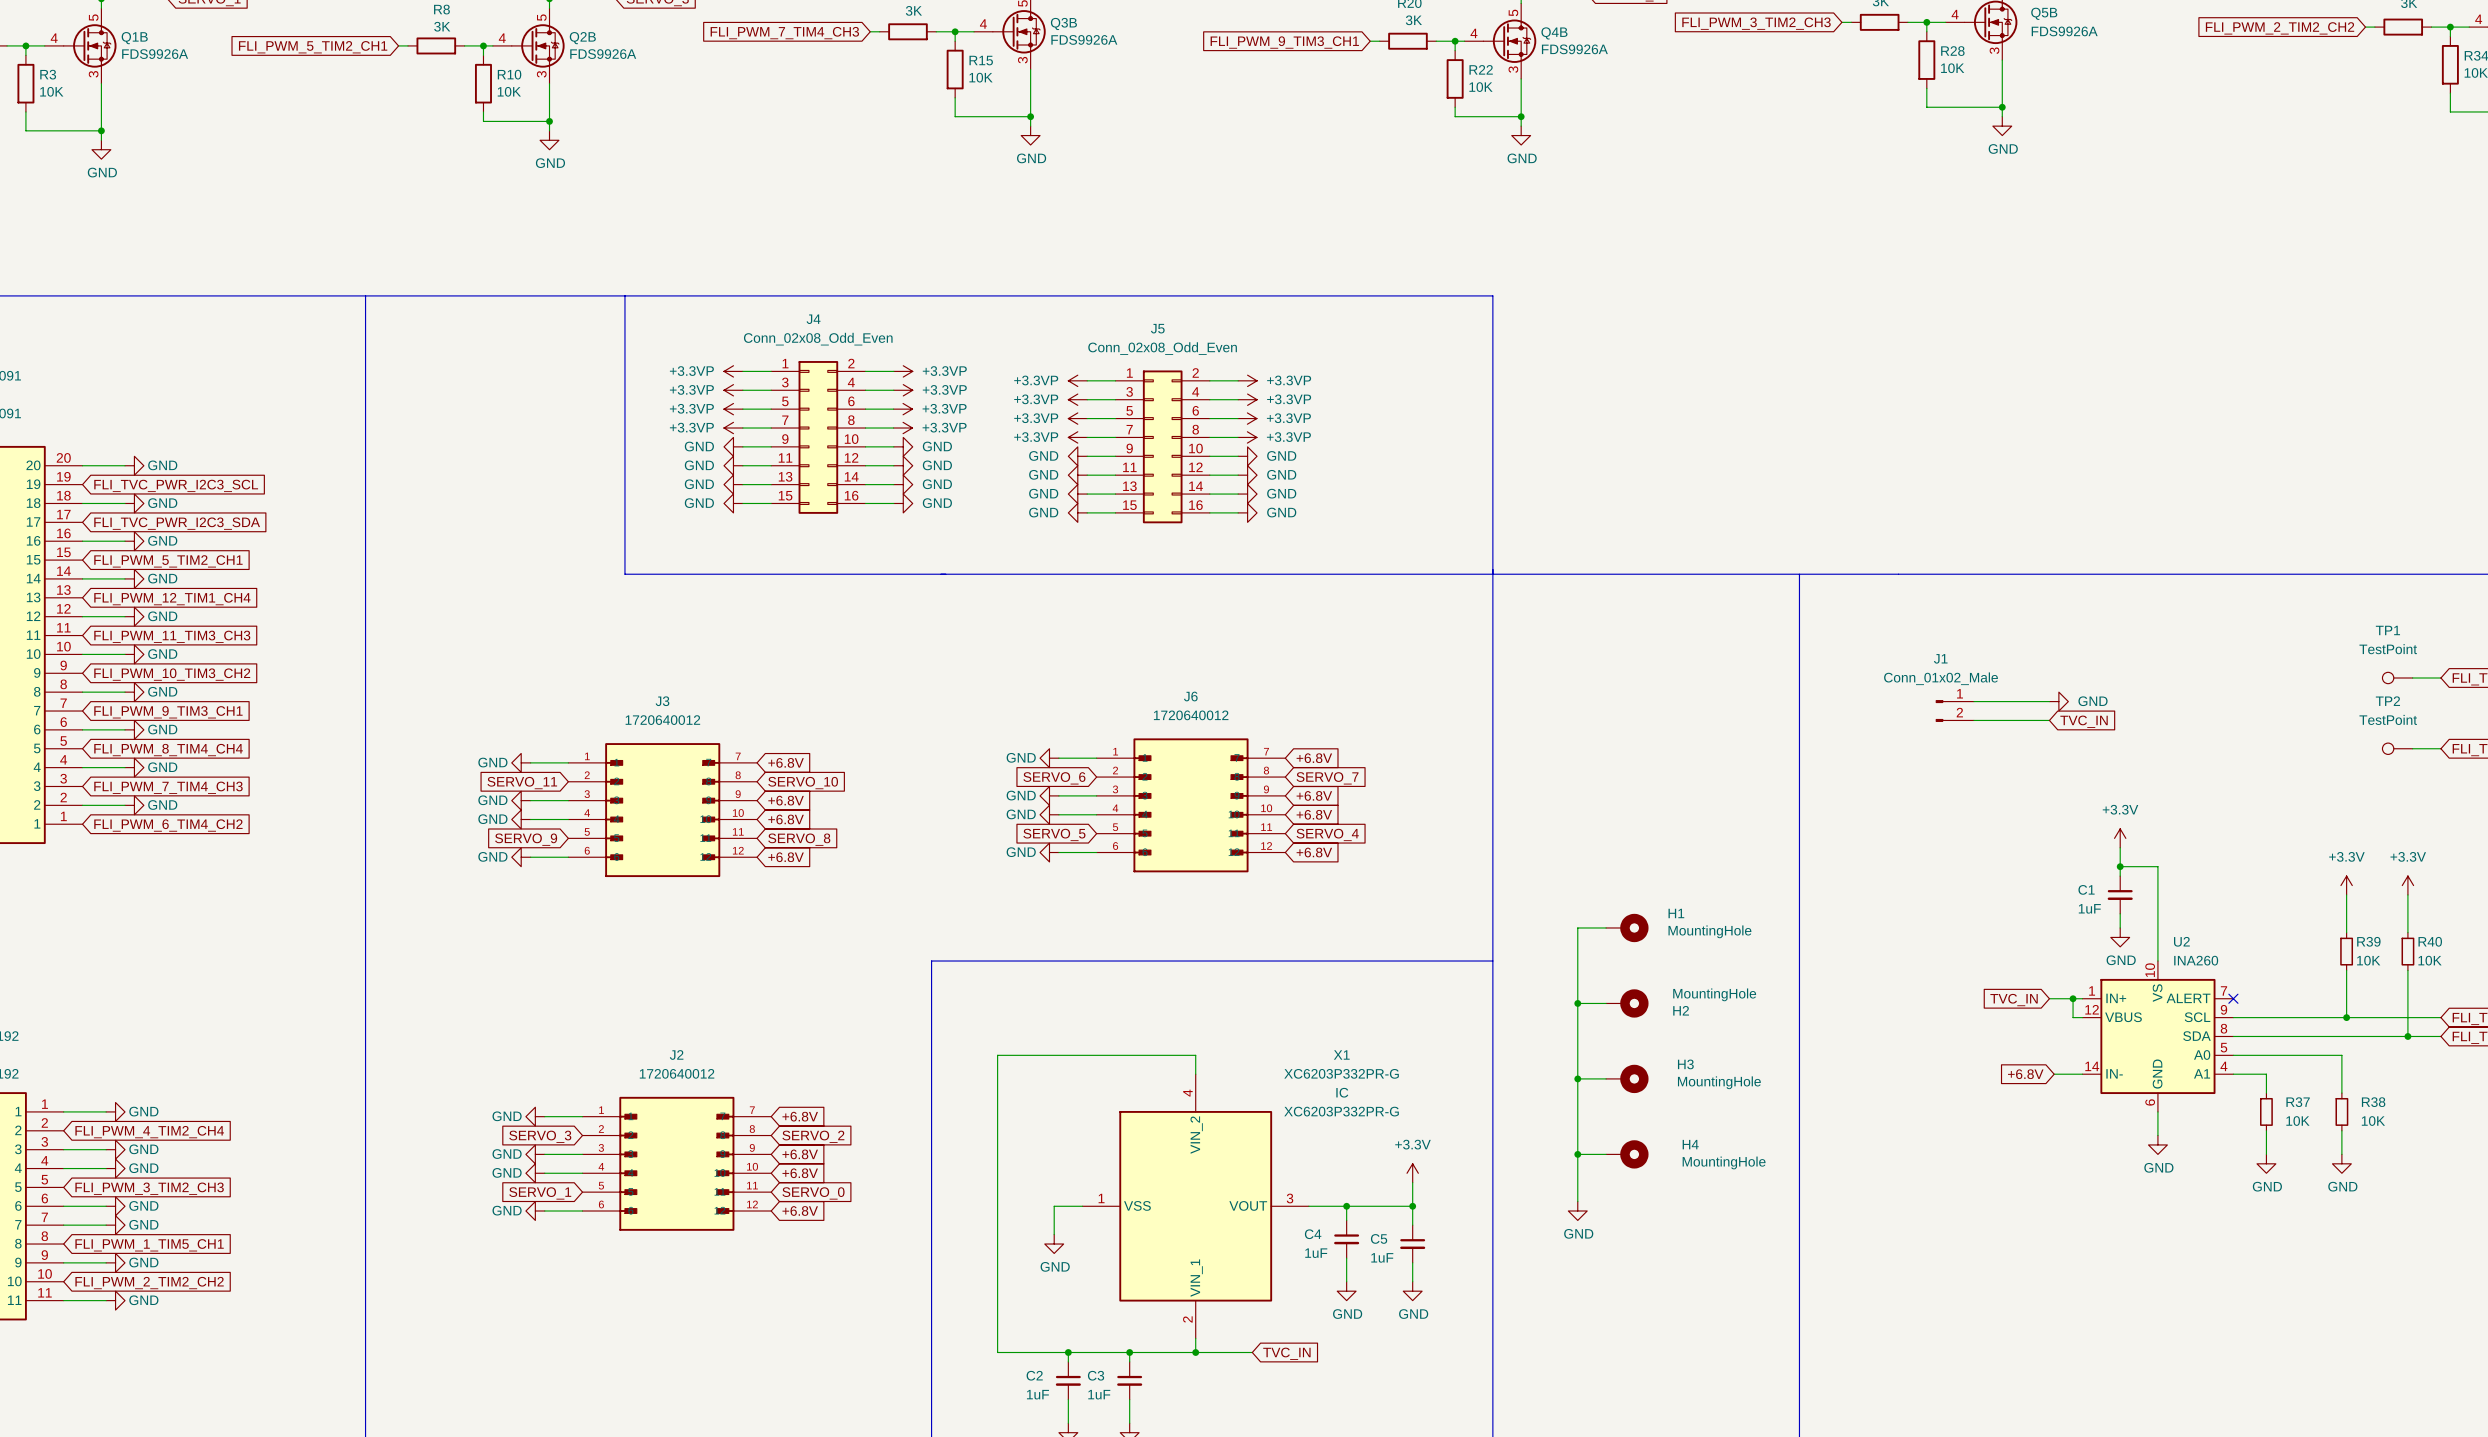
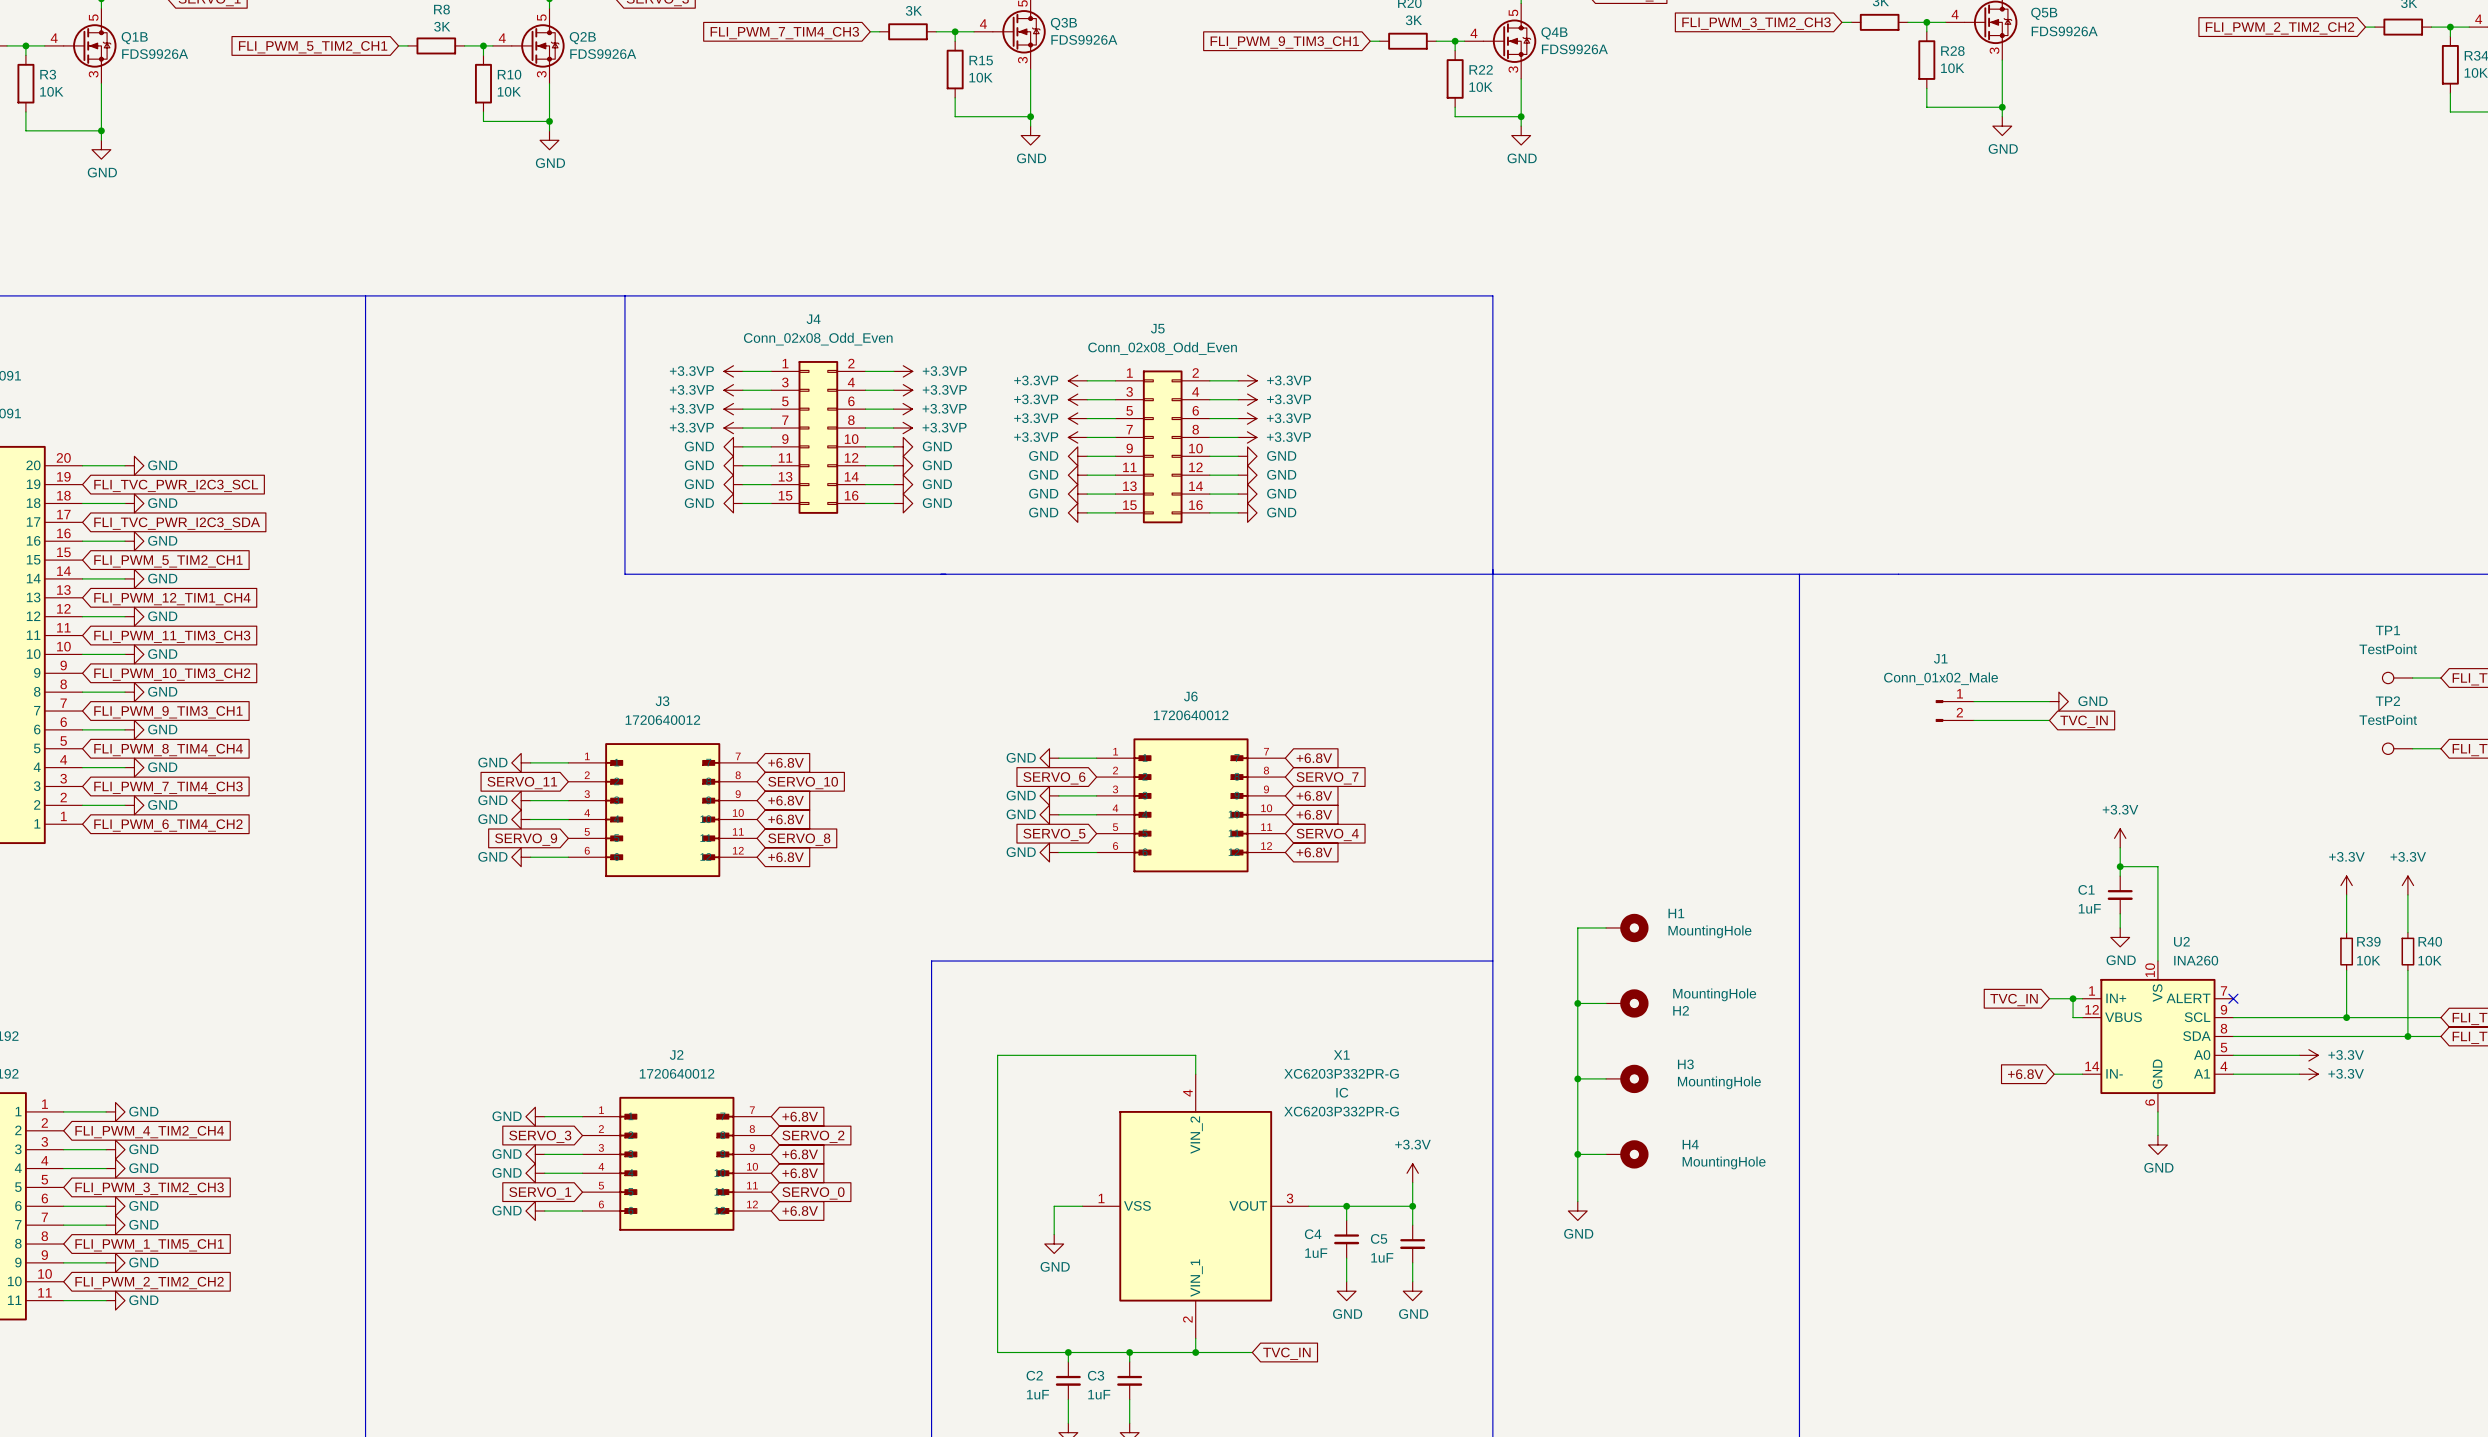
wire: (2299, 1055) (2341, 1055) (2341, 1093) -> none
power symbol: none -> +3.3V (2308, 1055)
wire: (2266, 1074) (2266, 1093) -> (2266, 1074) (2299, 1074)
power symbol: none -> +3.3V (2308, 1074)
R37: 10K (2266, 1111) -> none
R38: 10K (2341, 1111) -> none
wire: (2266, 1130) (2266, 1154) -> none
wire: (2341, 1130) (2341, 1154) -> none
power symbol: GND (2266, 1163) -> none
power symbol: GND (2341, 1163) -> none

